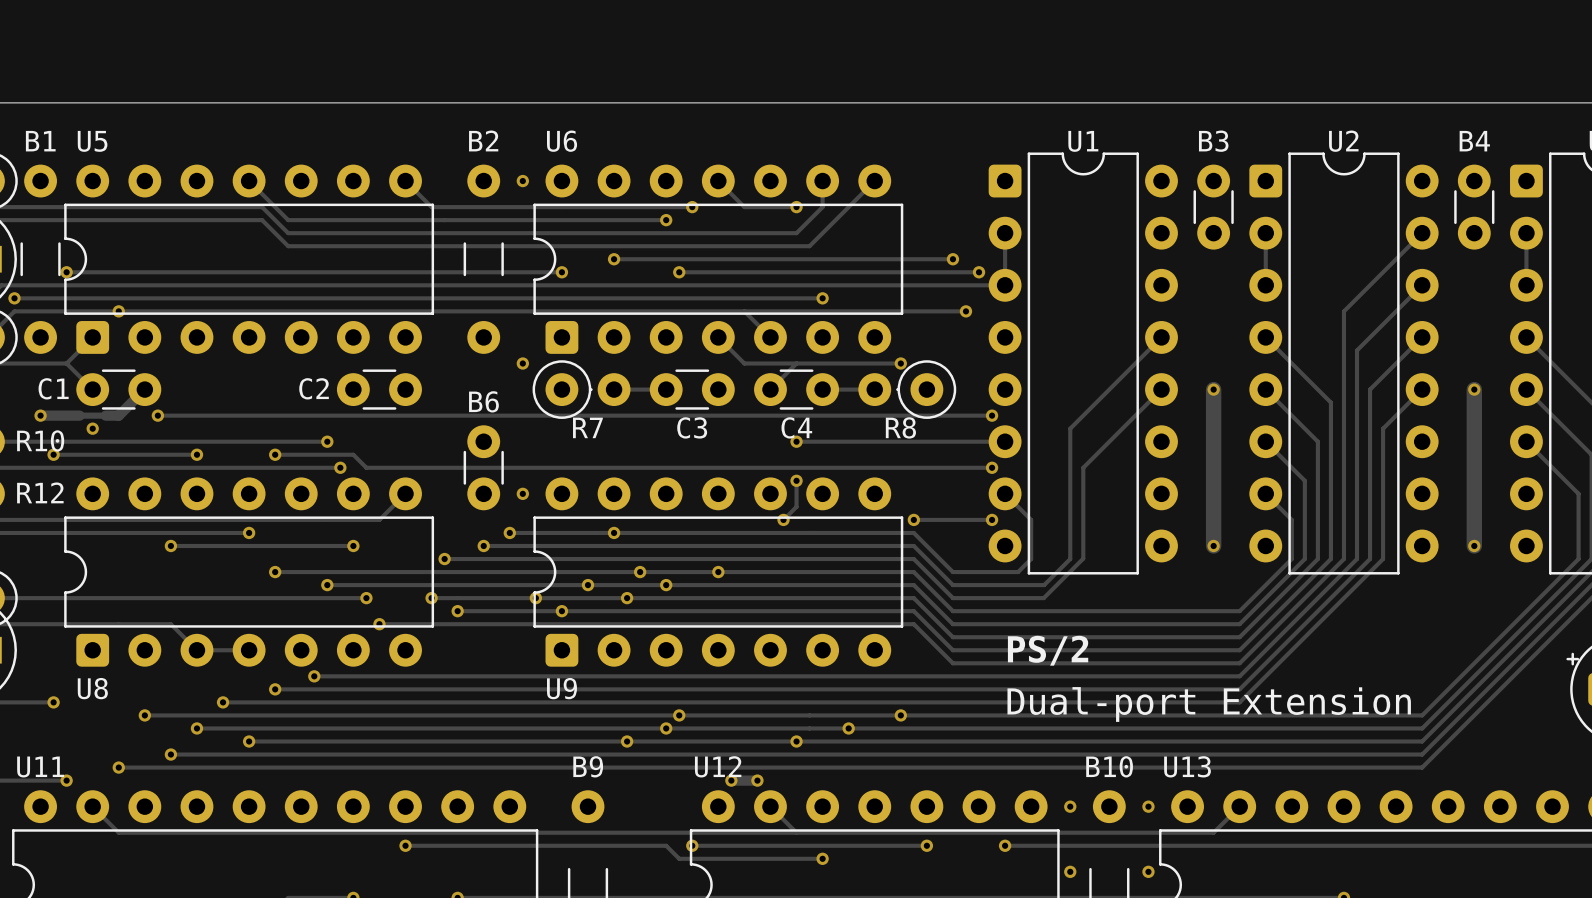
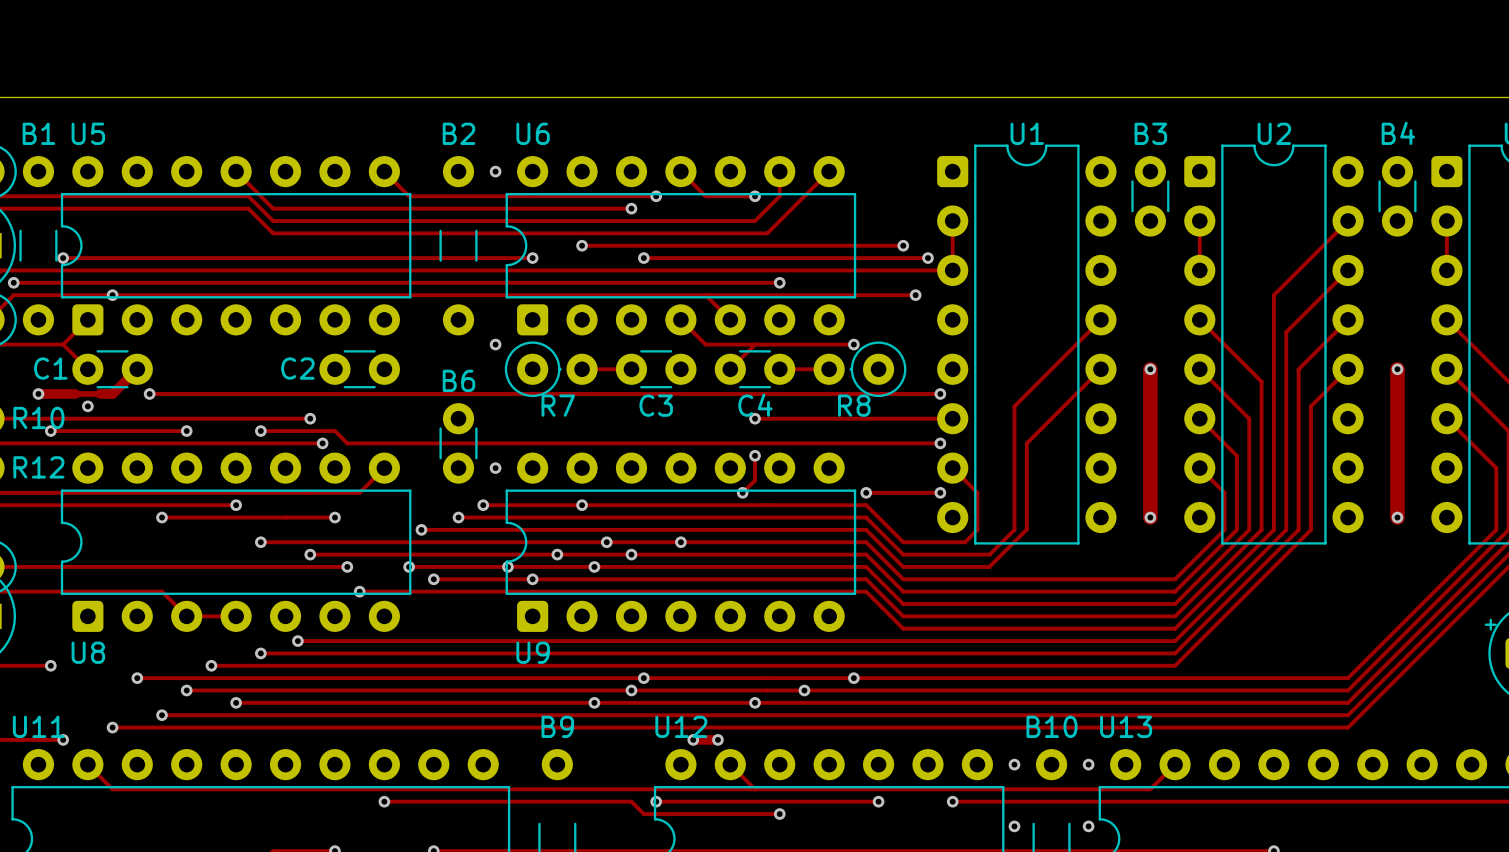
text: PS/2 (1048, 650) -> none
text: Dual-port Extension (1209, 704) -> none

